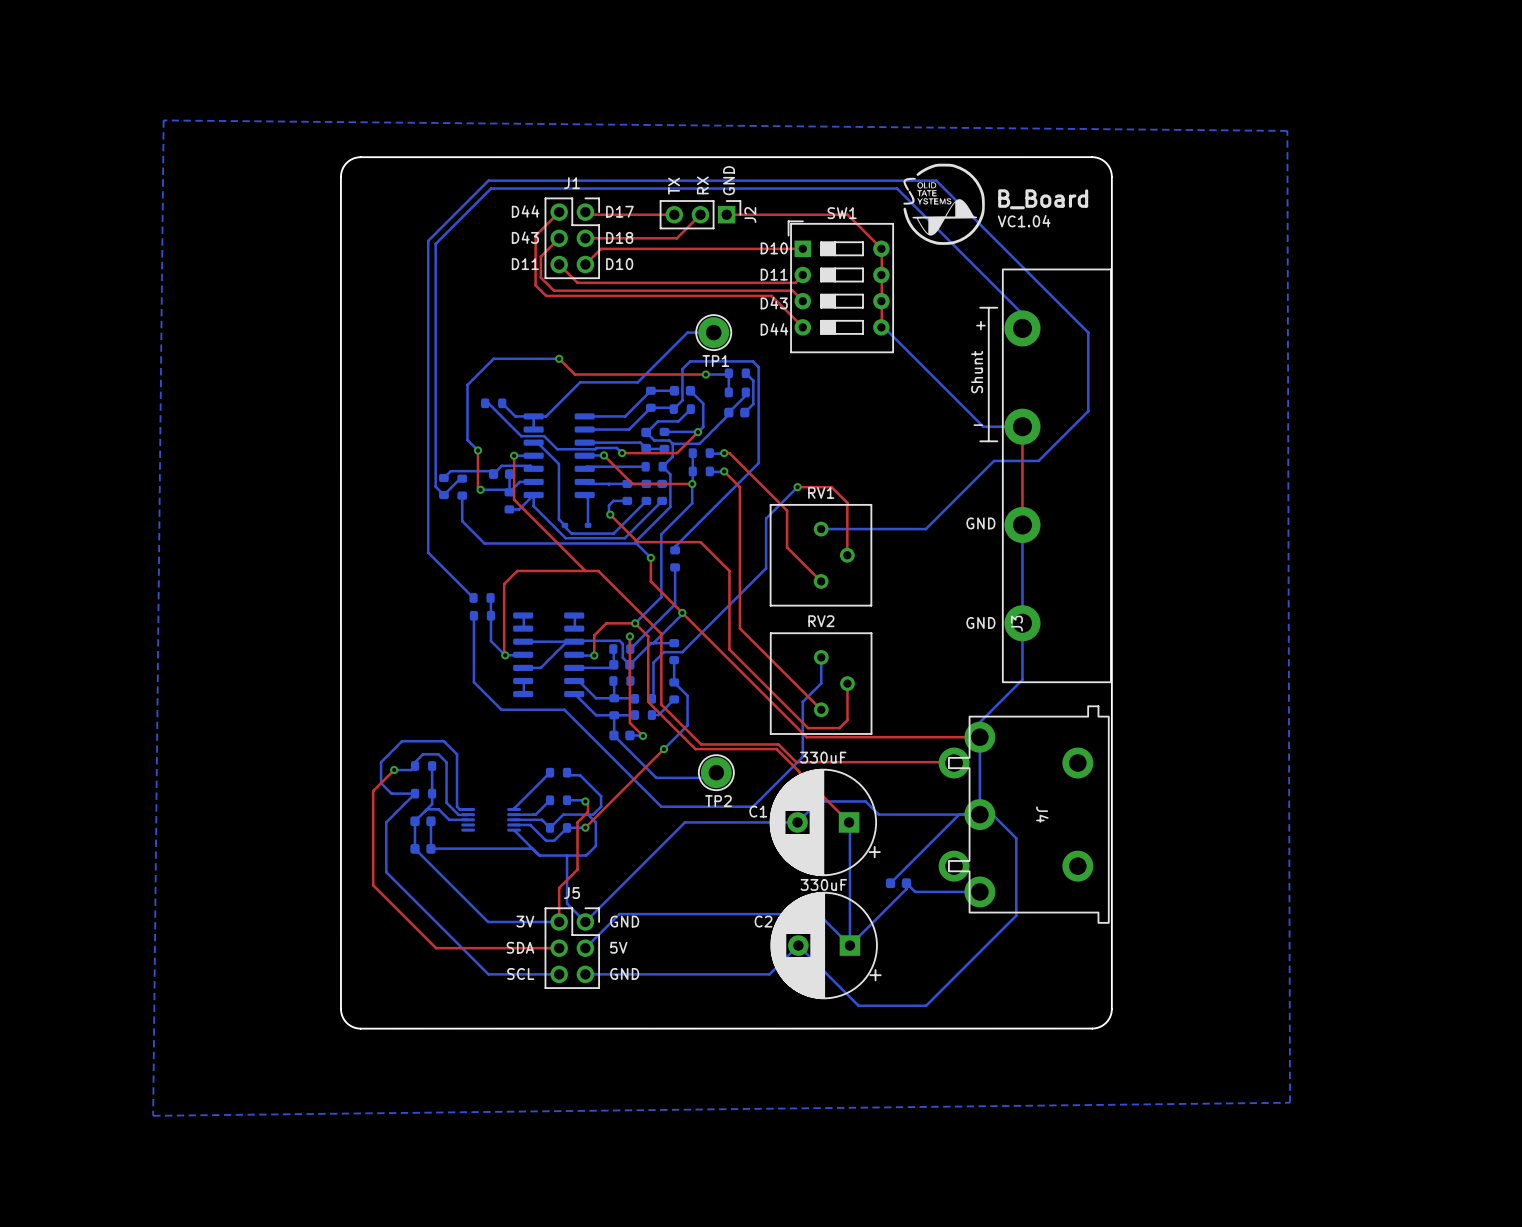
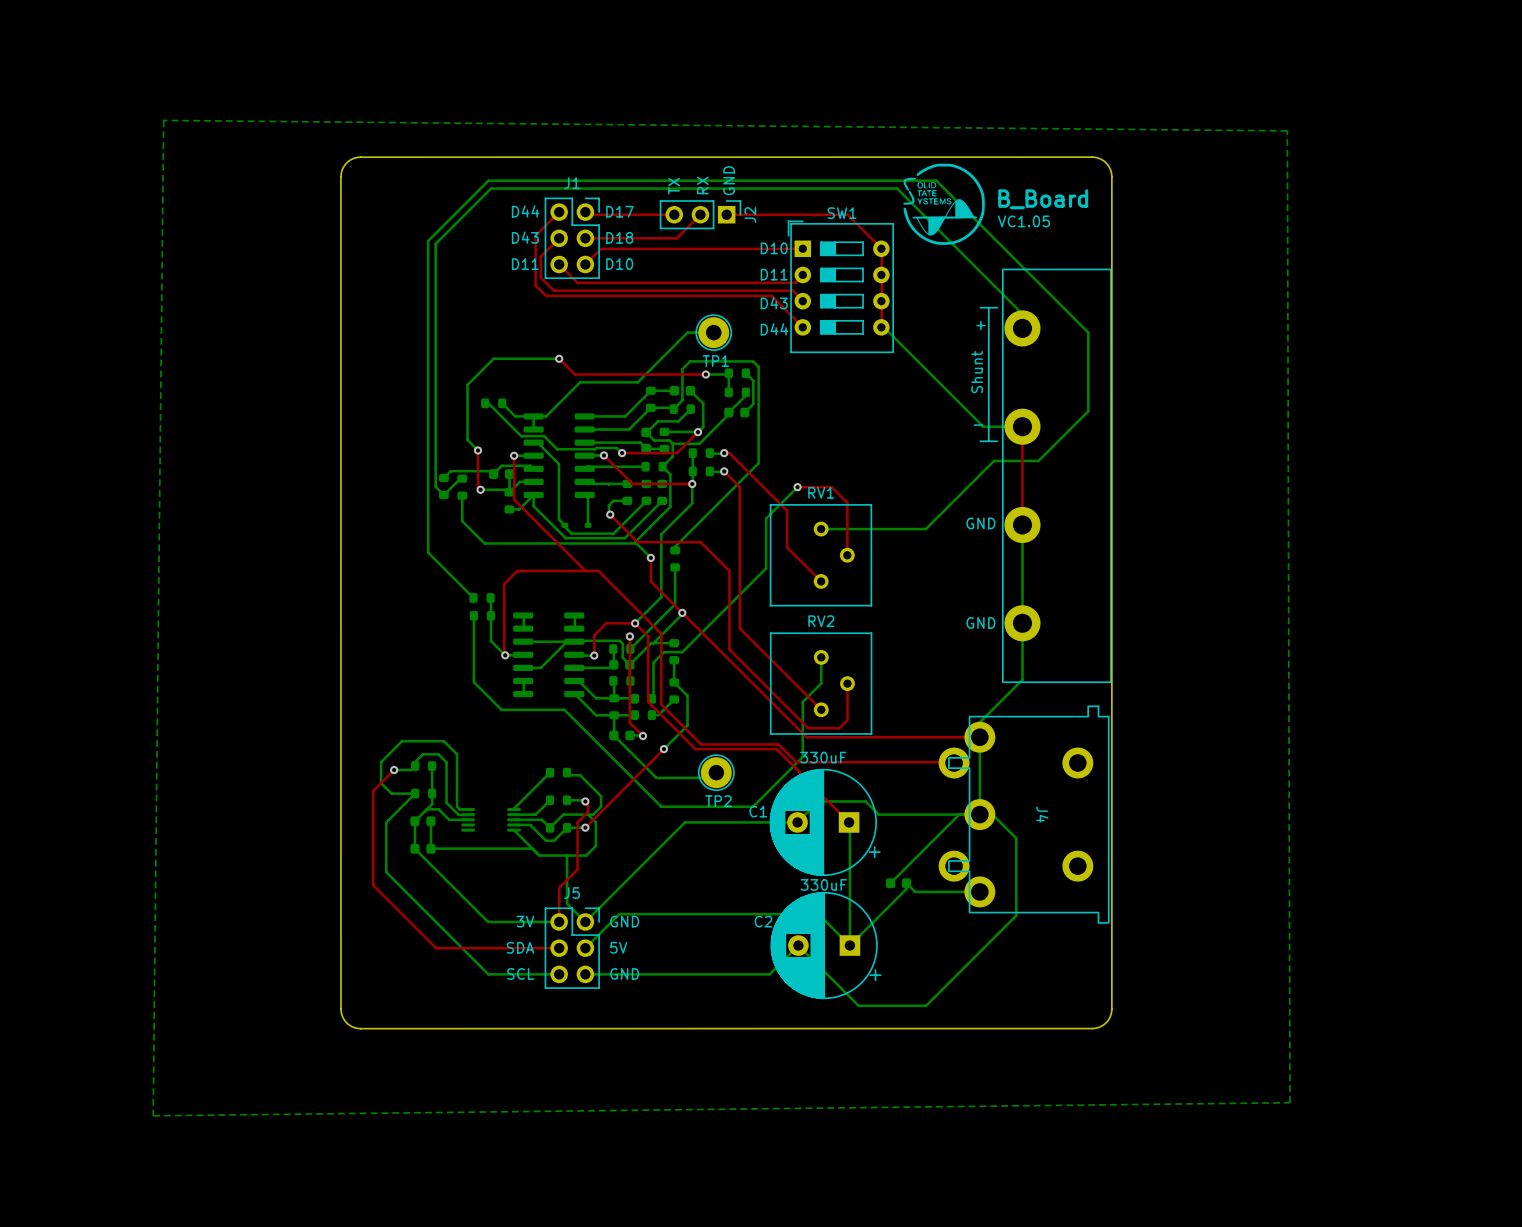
text: VC1.04 (1024, 221) -> VC1.05 (1023, 221)
J3 name: J3 (1016, 623) -> none

